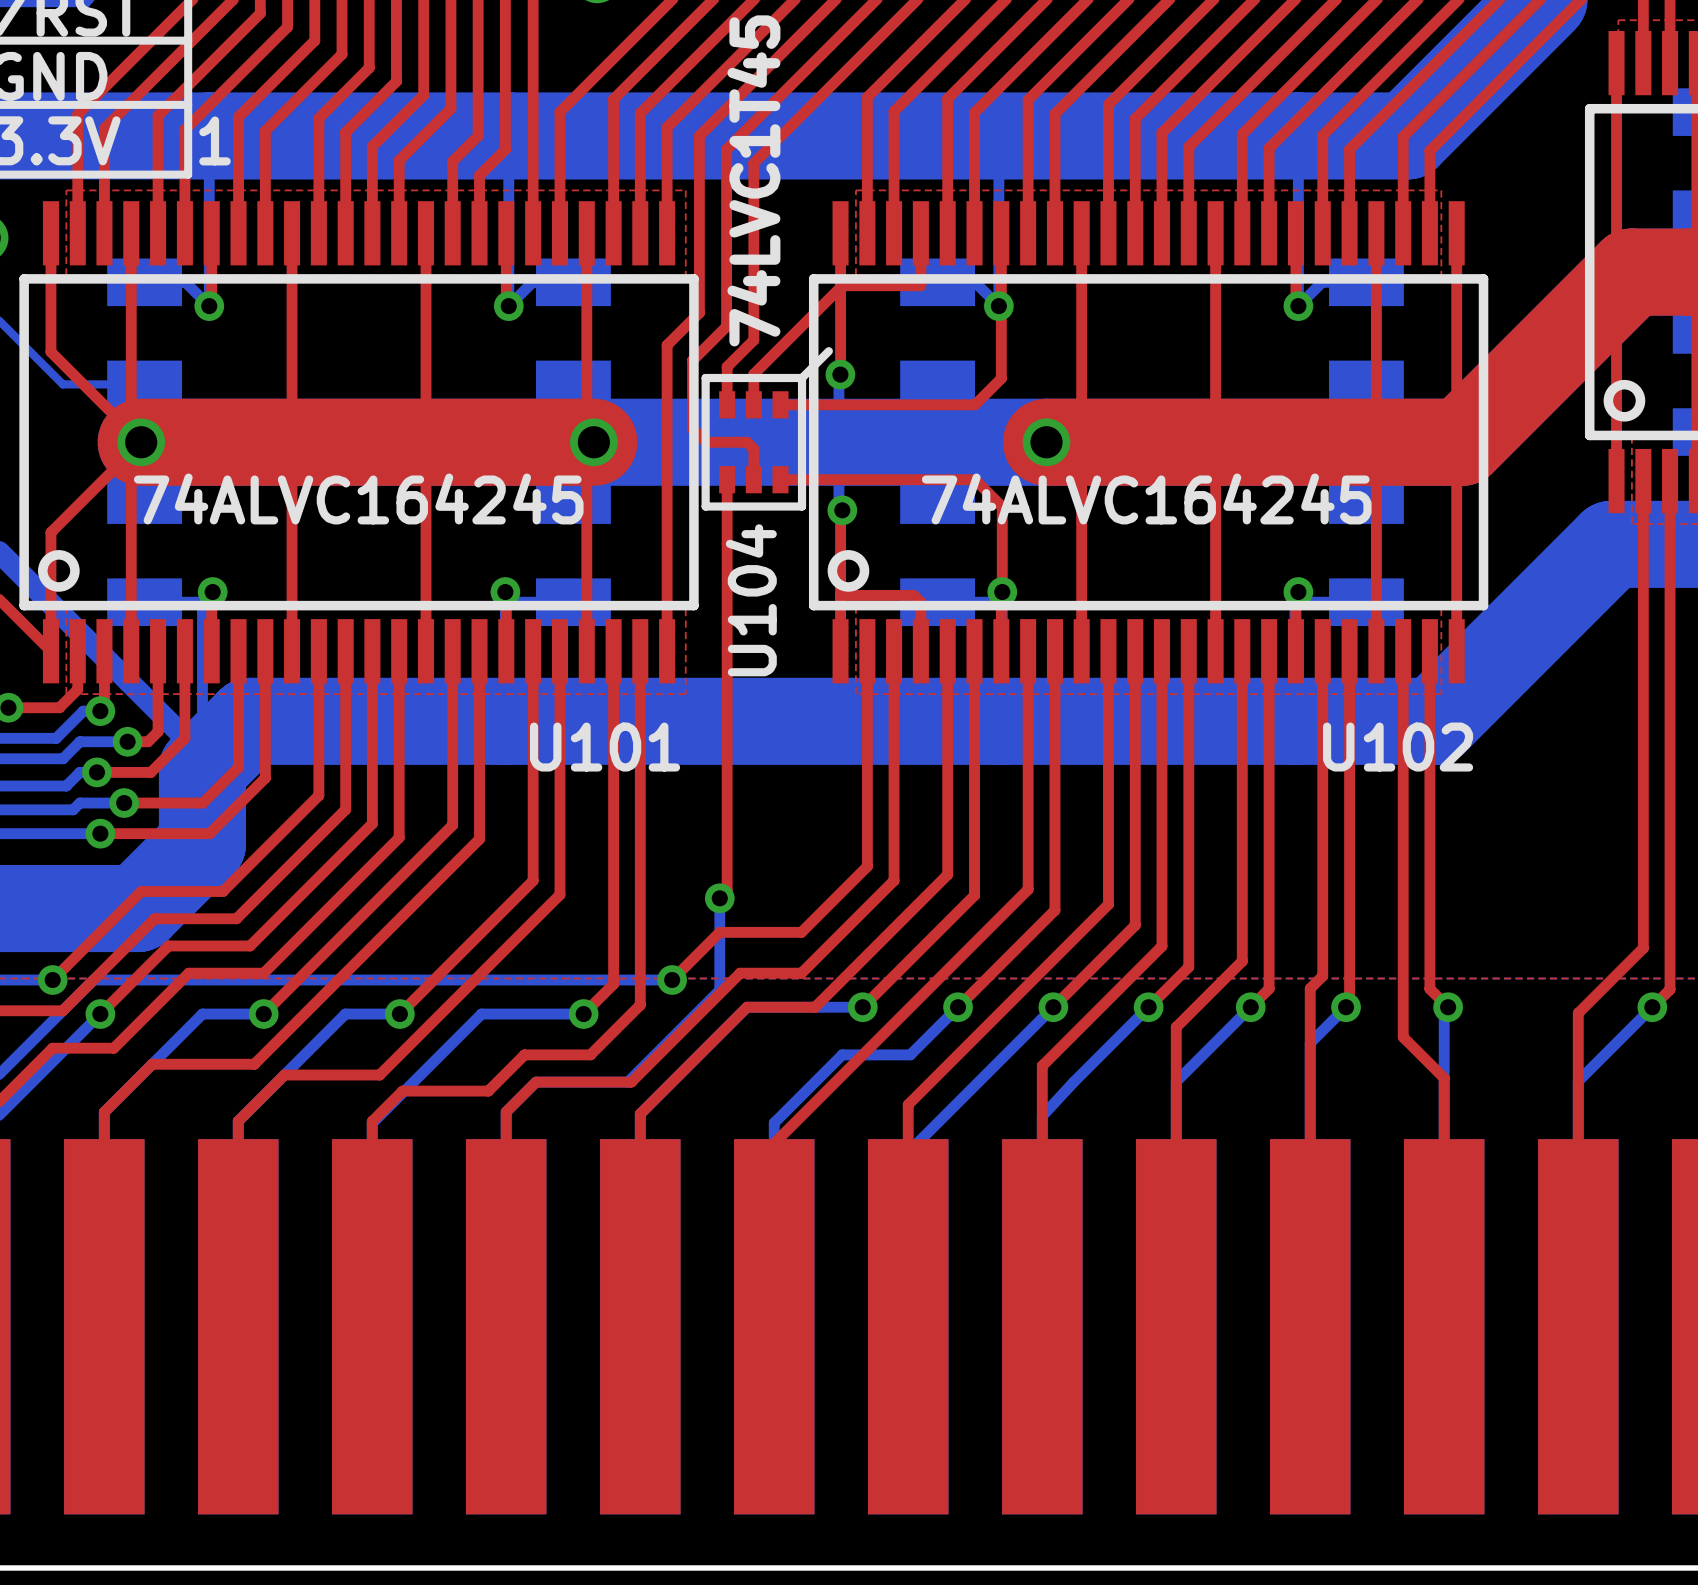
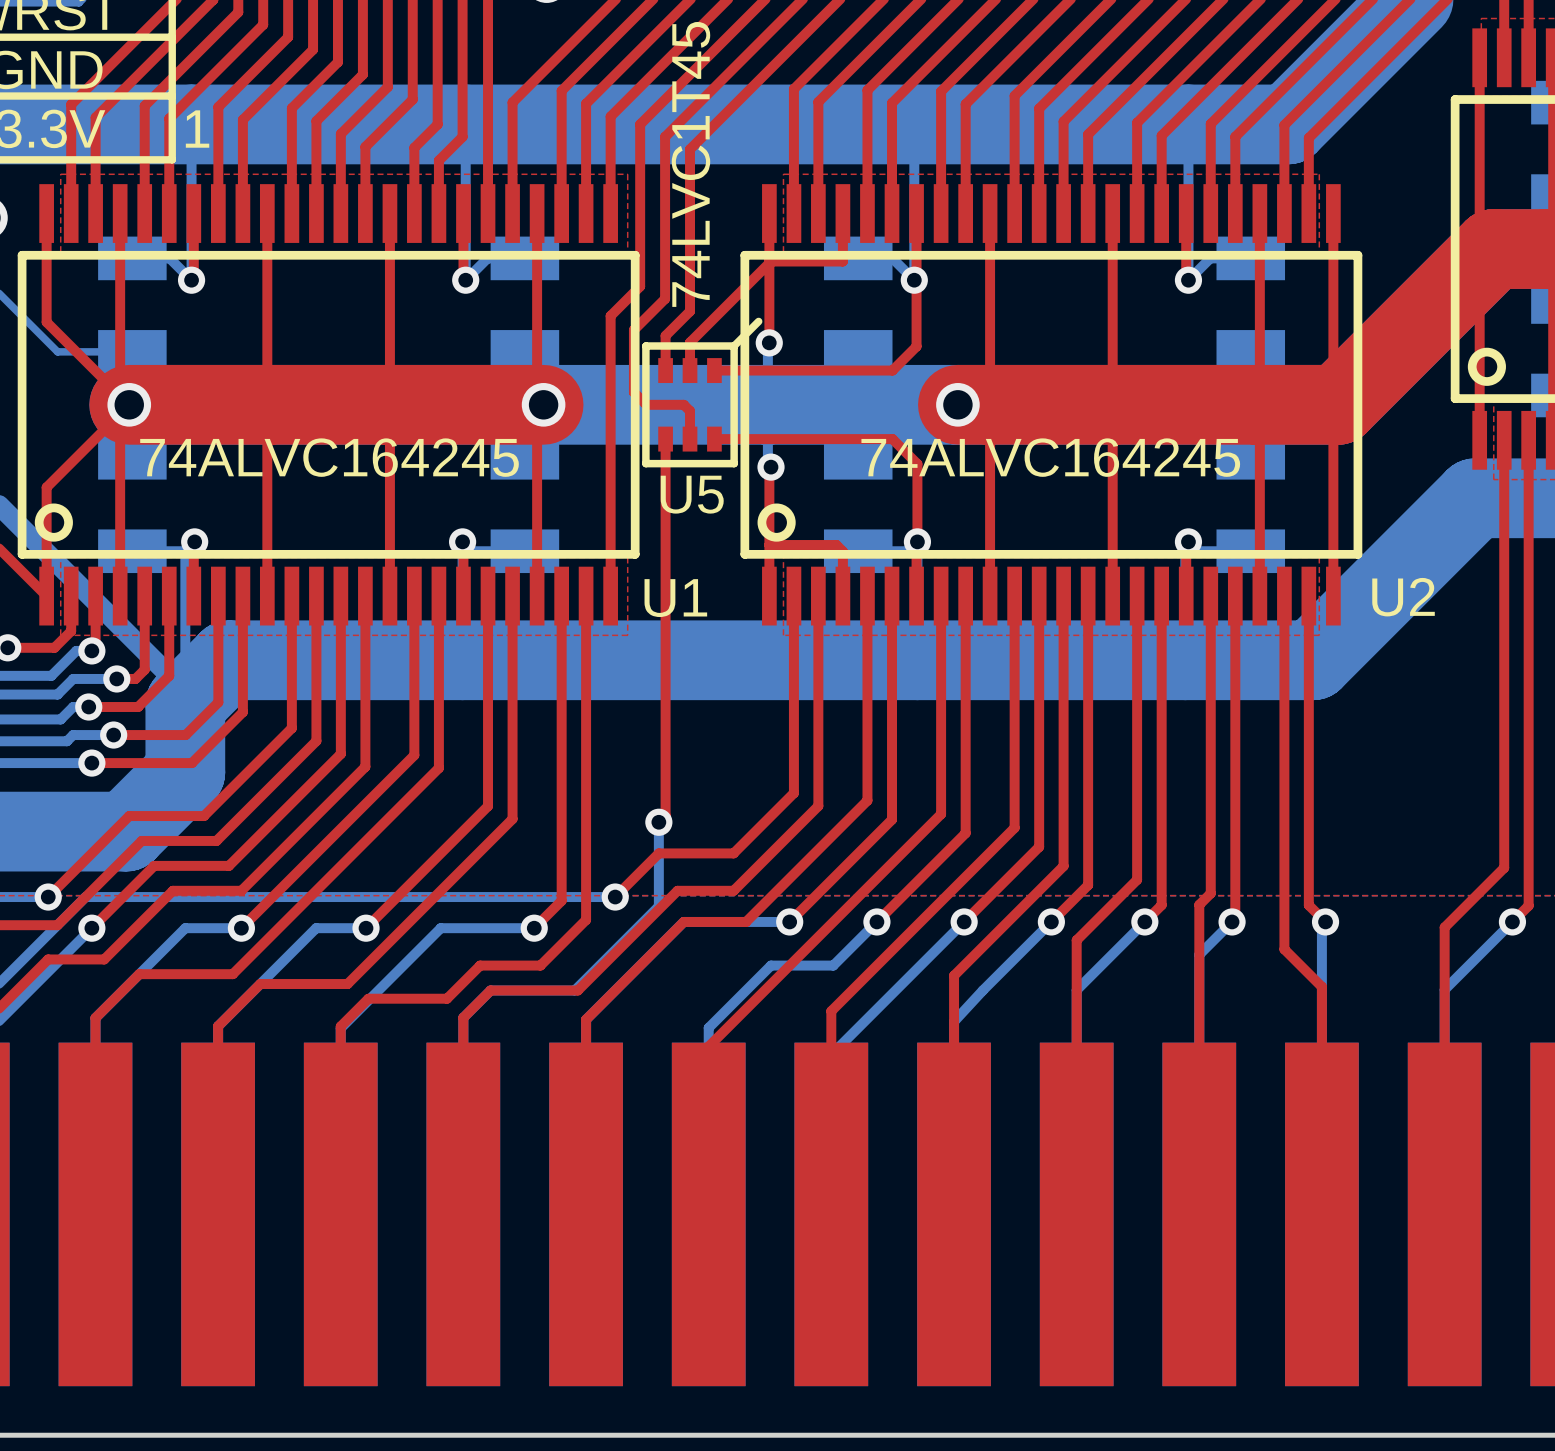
U104 name: U104 (751, 600) -> U5 (692, 494)
U101 name: U101 (605, 747) -> U1 (675, 598)
U102 name: U102 (1398, 747) -> U2 (1403, 597)

